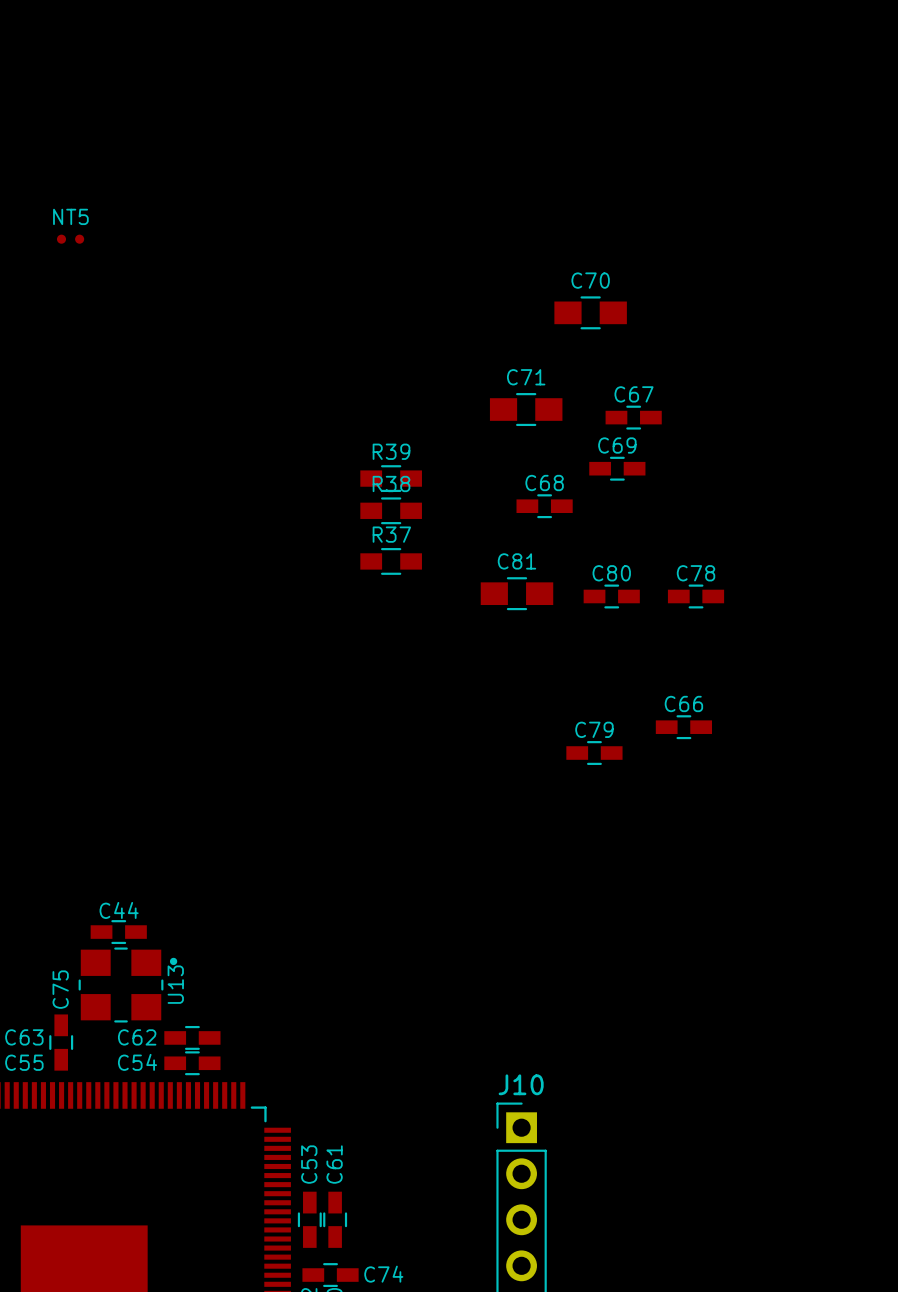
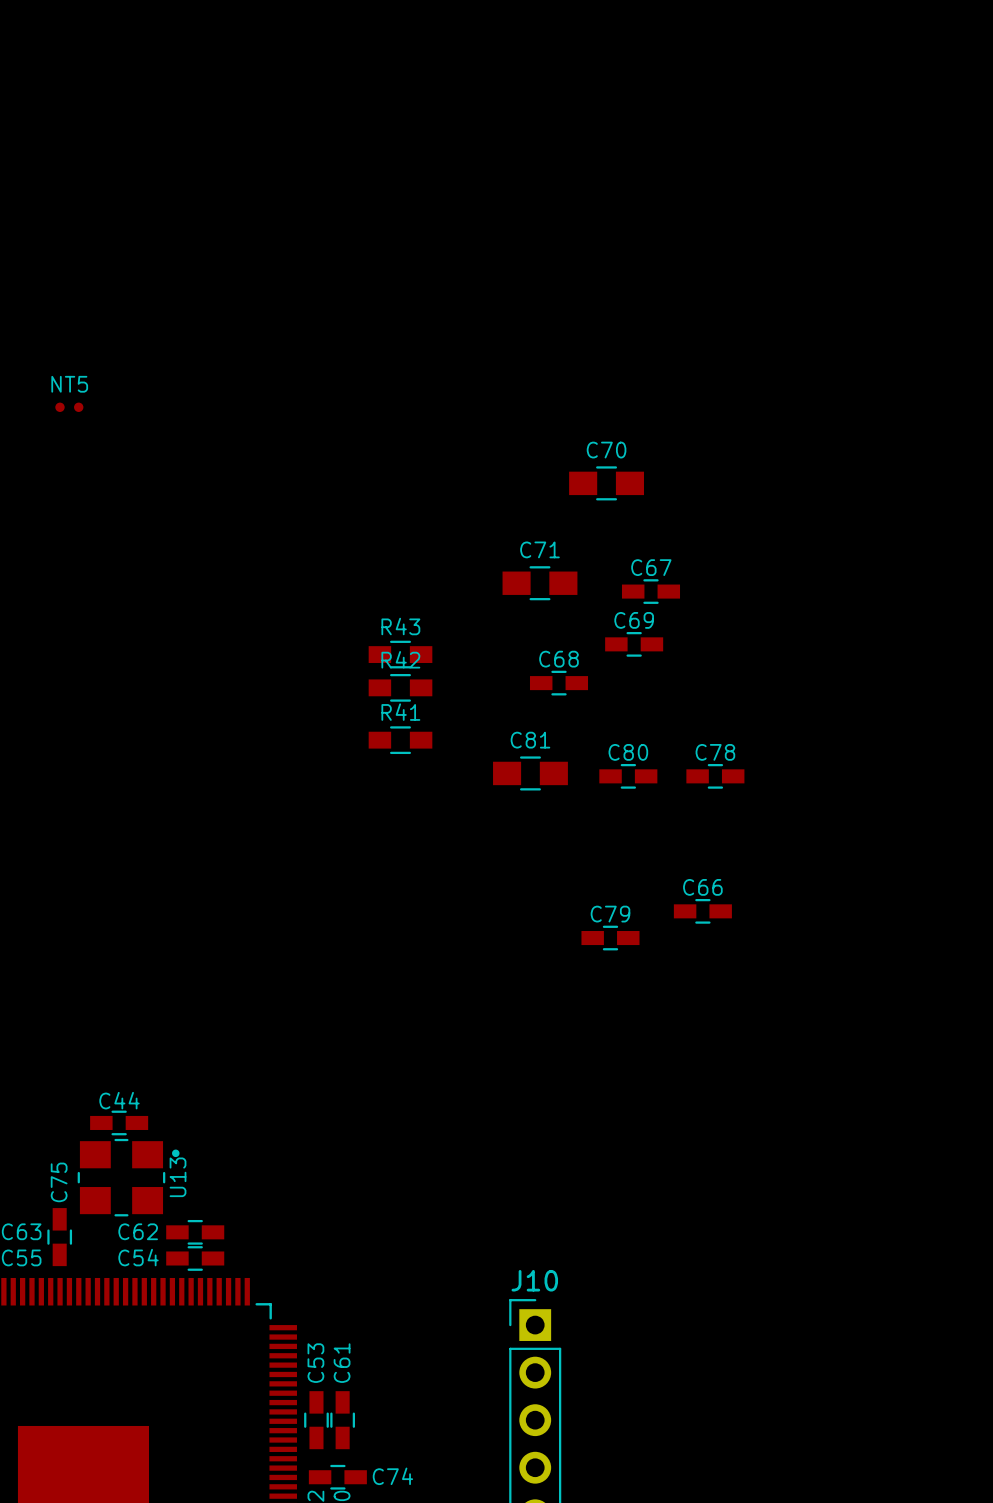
R39 name: R39 (391, 451) -> R43 (400, 626)
R38 name: R38 (391, 483) -> R42 (400, 659)
R37 name: R37 (391, 534) -> R41 (400, 712)

